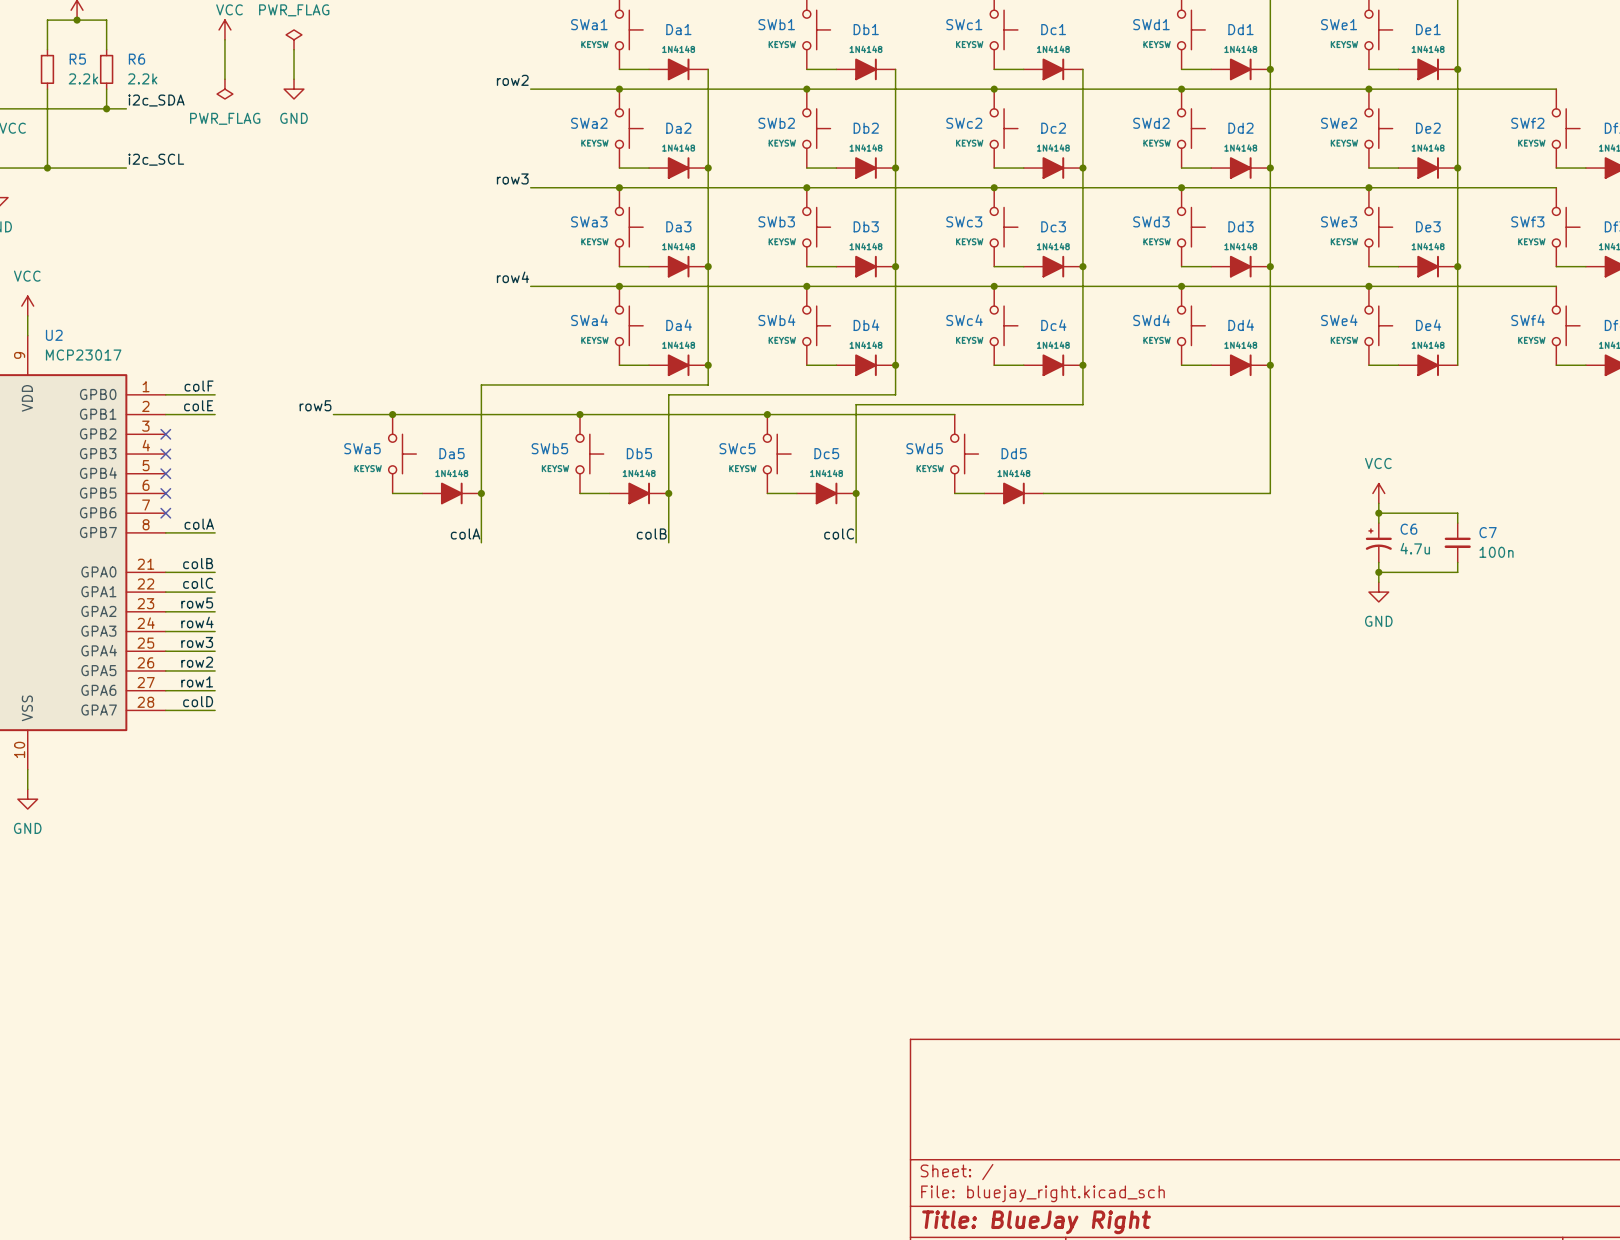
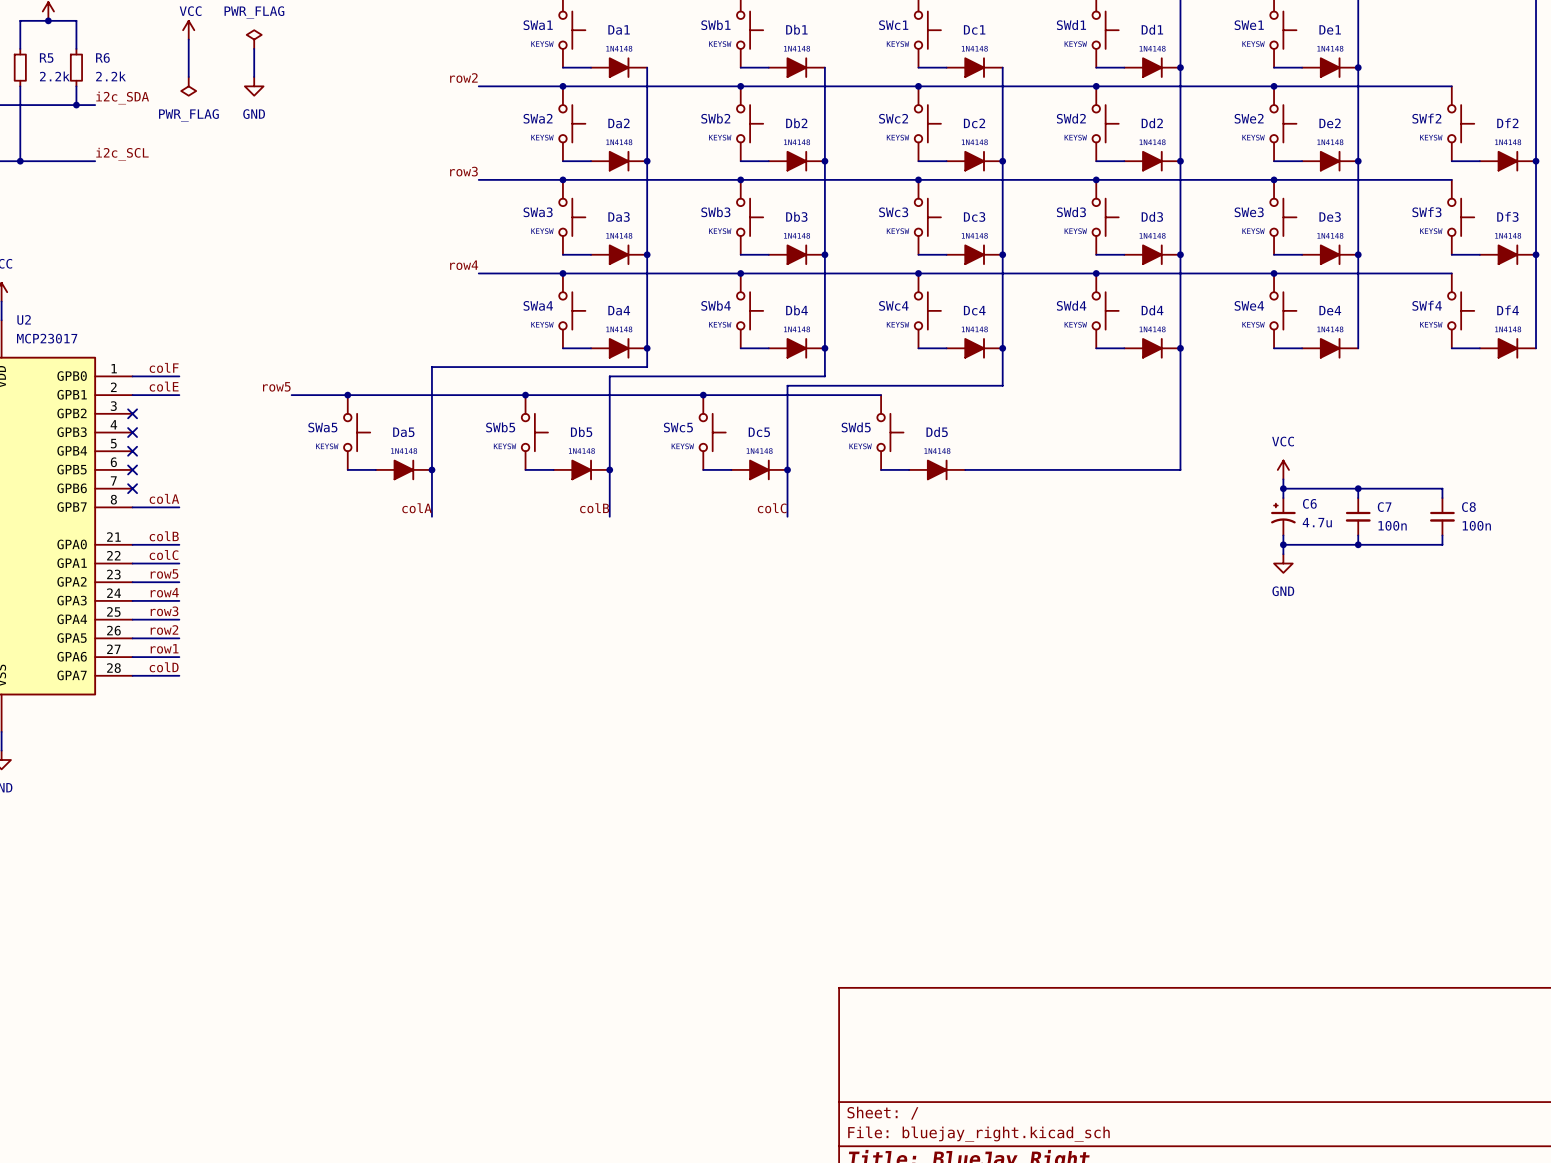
wire: none -> (1358, 488) (1442, 488) (1442, 498)
junction: none -> (1358, 488)
C8: none -> 100n (1442, 516)
wire: none -> (1442, 535) (1442, 544) (1358, 544)
junction: none -> (1358, 544)

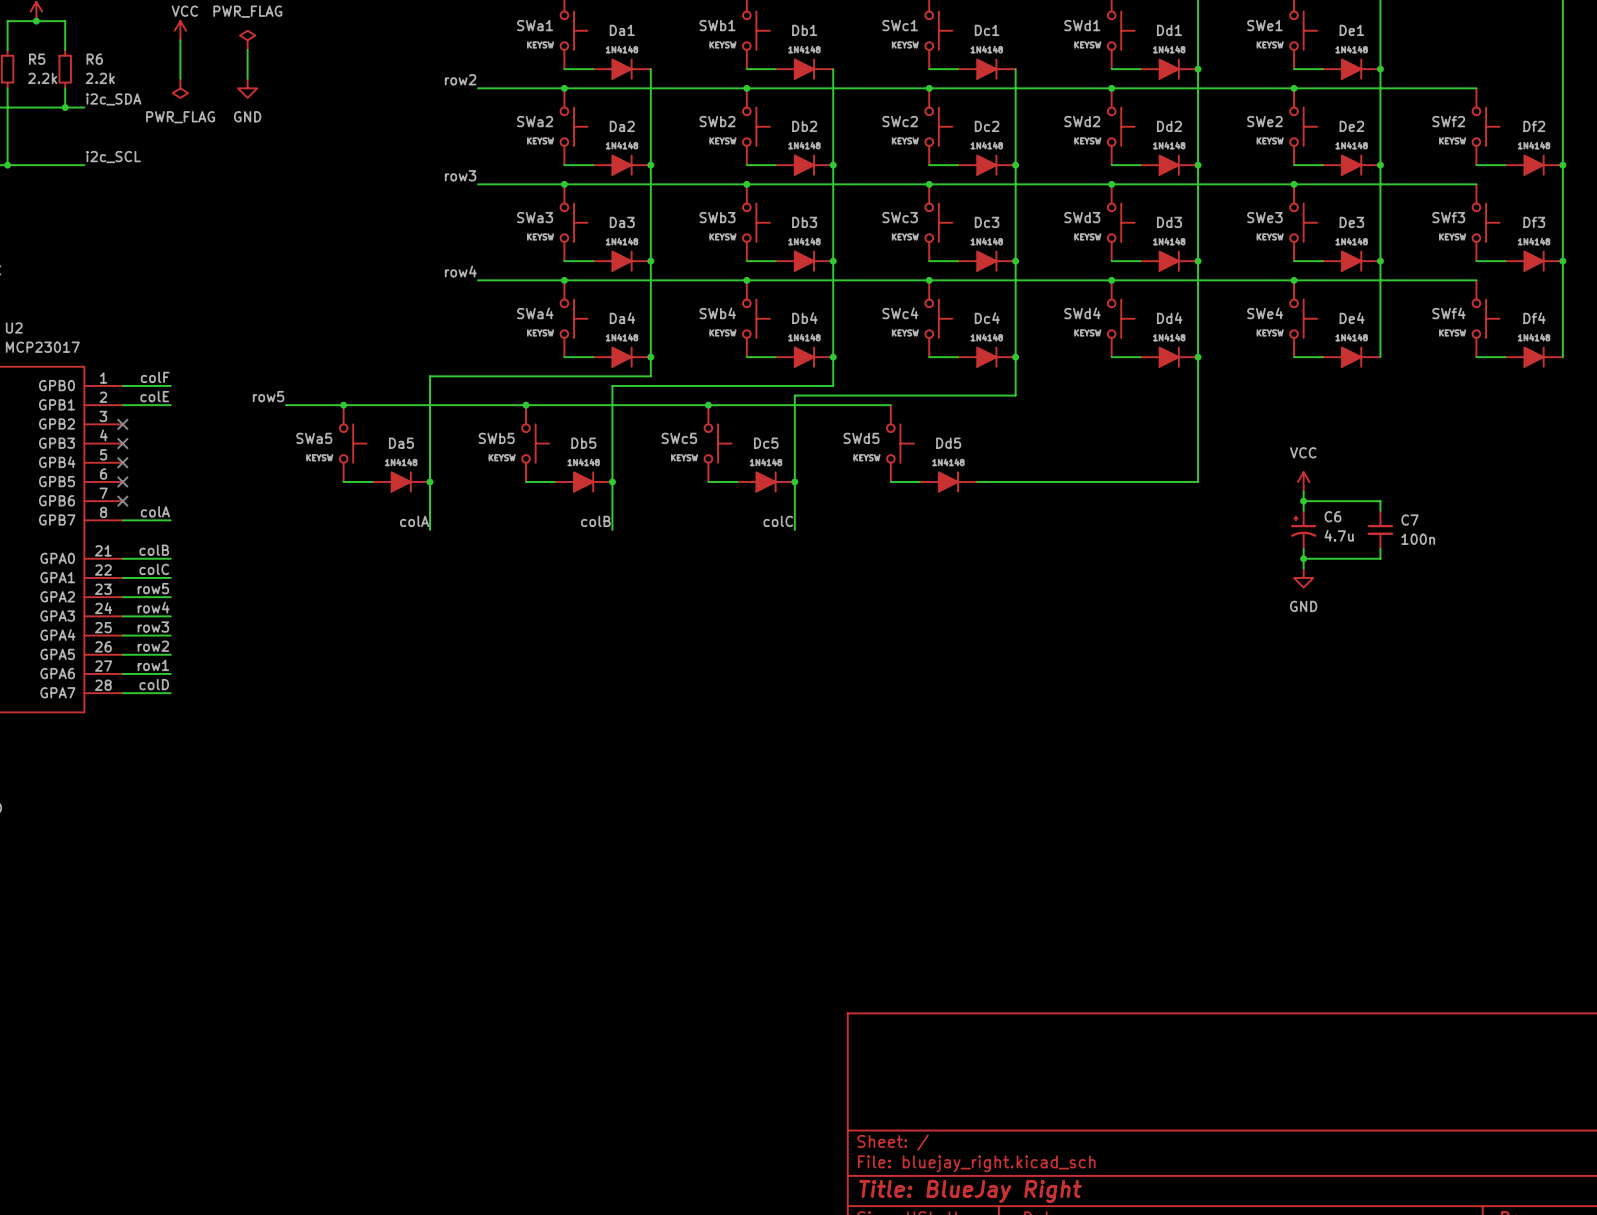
wire: (1358, 488) (1442, 488) (1442, 498) -> none
junction: (1358, 488) -> none
C8: 100n (1442, 516) -> none
wire: (1442, 535) (1442, 544) (1358, 544) -> none
junction: (1358, 544) -> none

